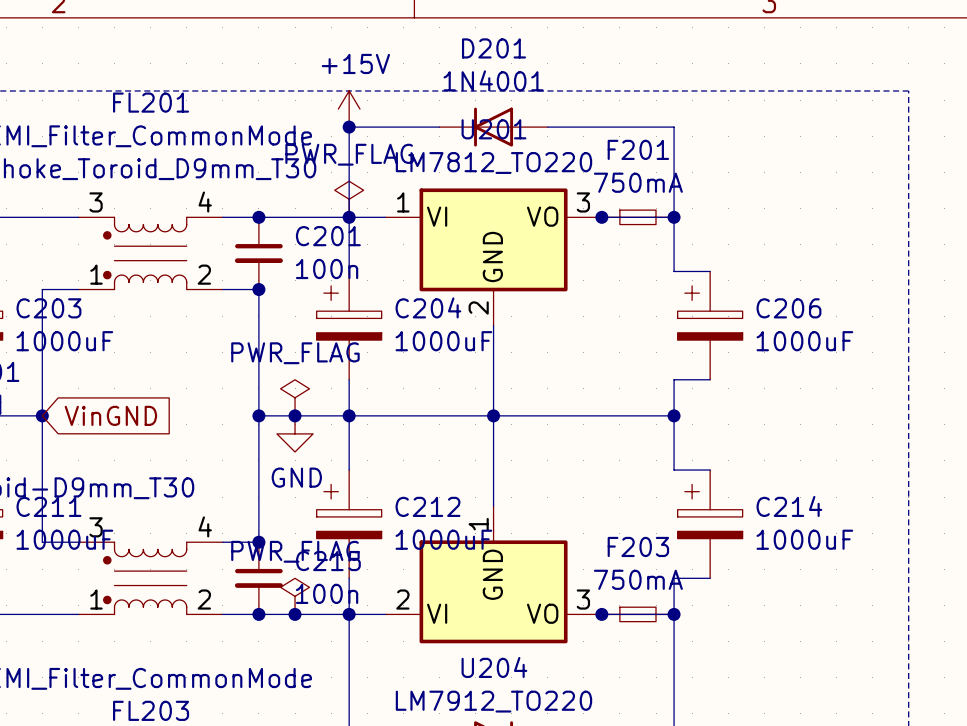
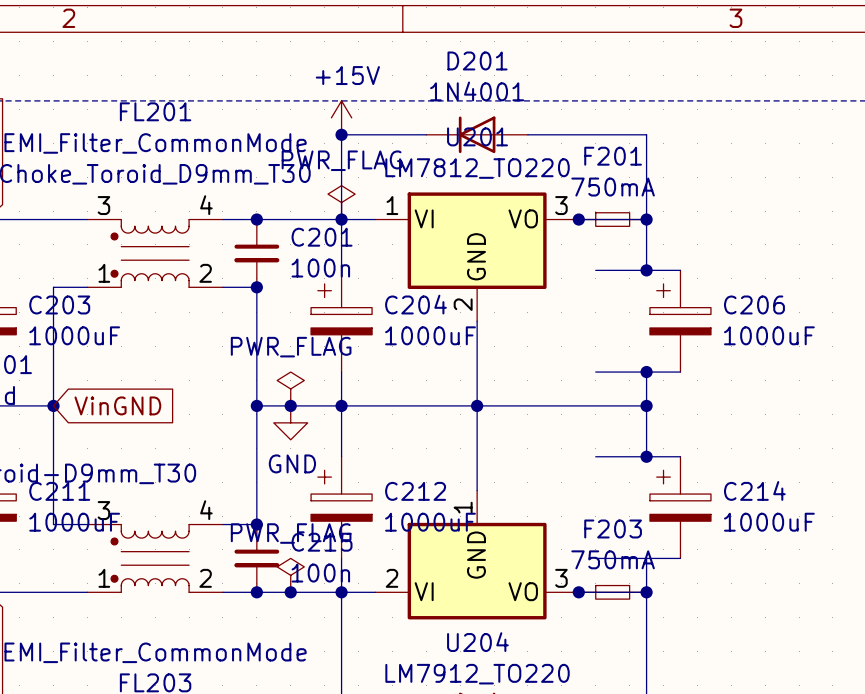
wire: none -> (595, 270) (646, 270)
junction: none -> (646, 270)
wire: none -> (595, 372) (646, 372)
junction: none -> (646, 372)
wire: none -> (595, 456) (646, 456)
junction: none -> (646, 456)
wire: none -> (595, 558) (646, 558)

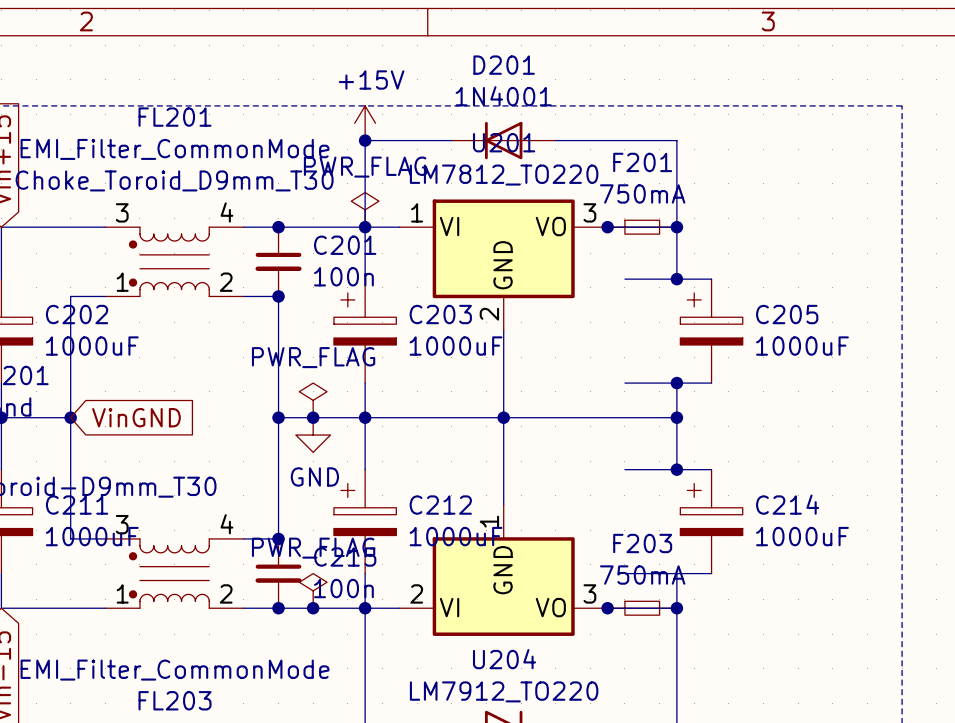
C203 name: C203 (59, 304) -> C202 (77, 314)
C204 name: C204 (415, 304) -> C203 (440, 314)
C206 name: C206 (754, 304) -> C205 (787, 314)

